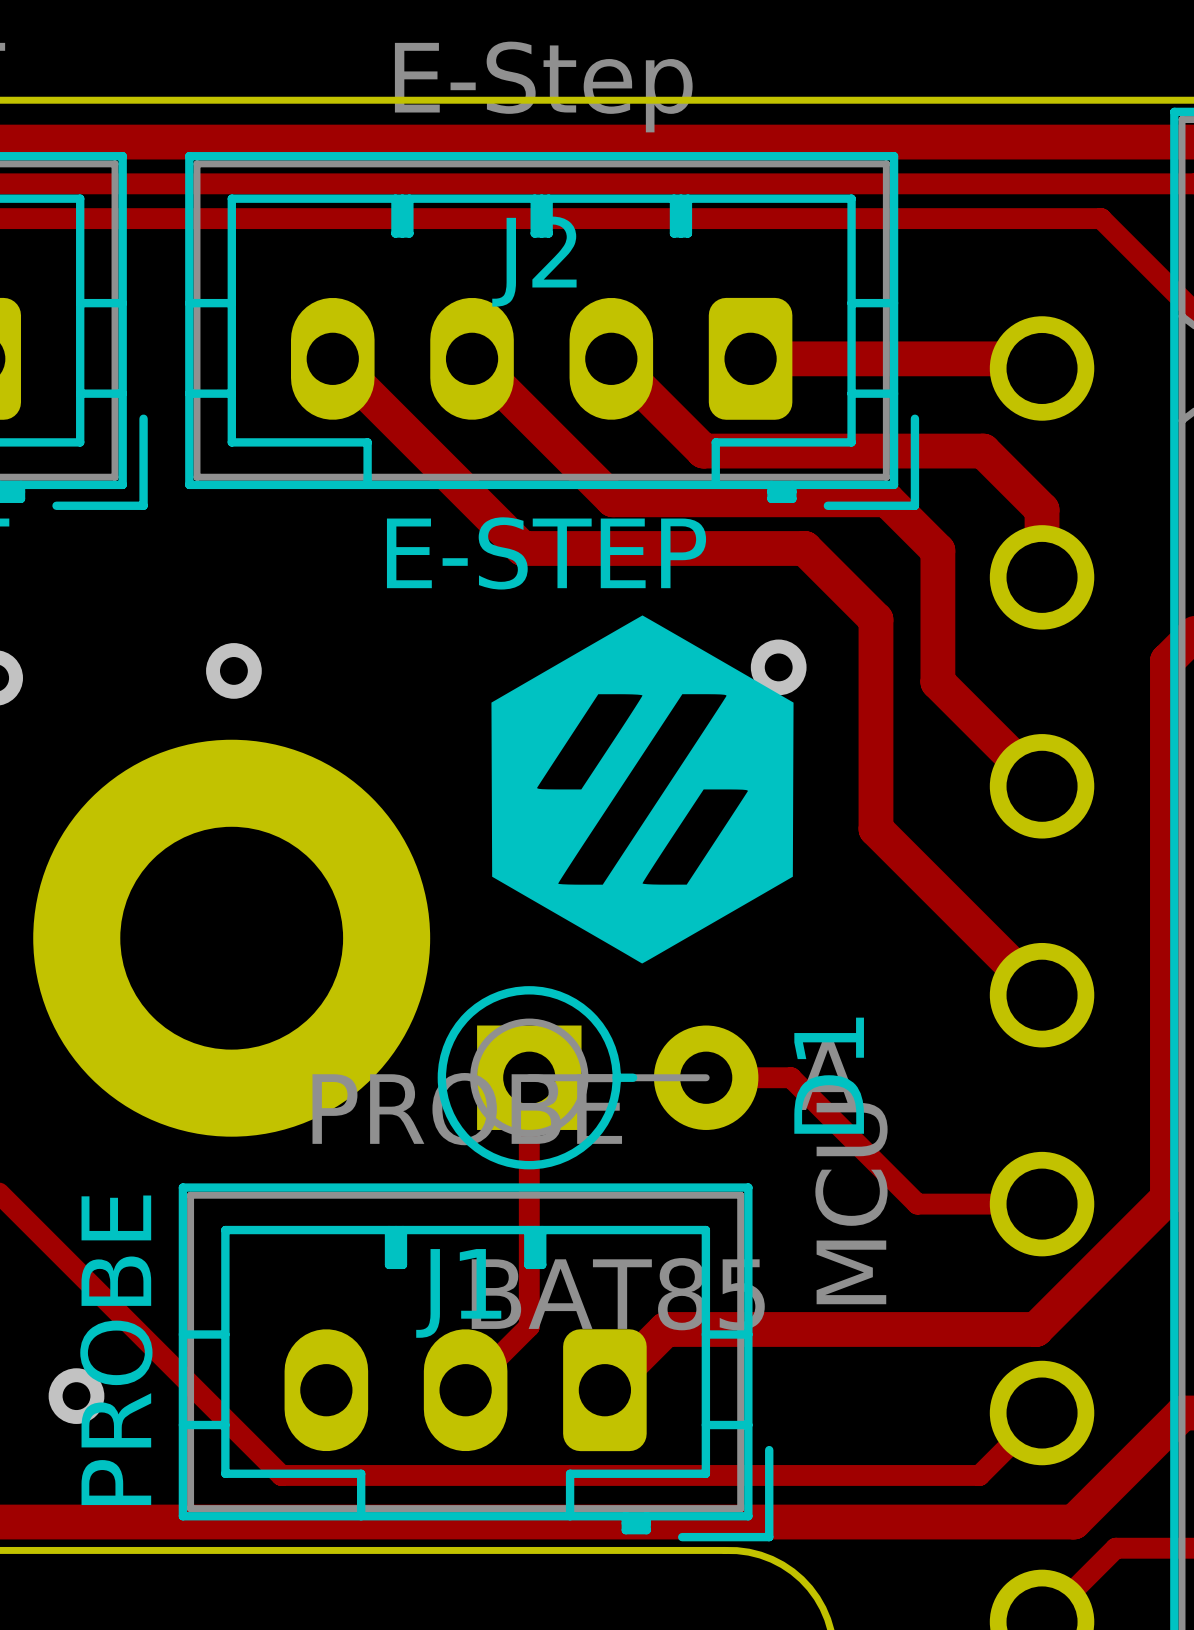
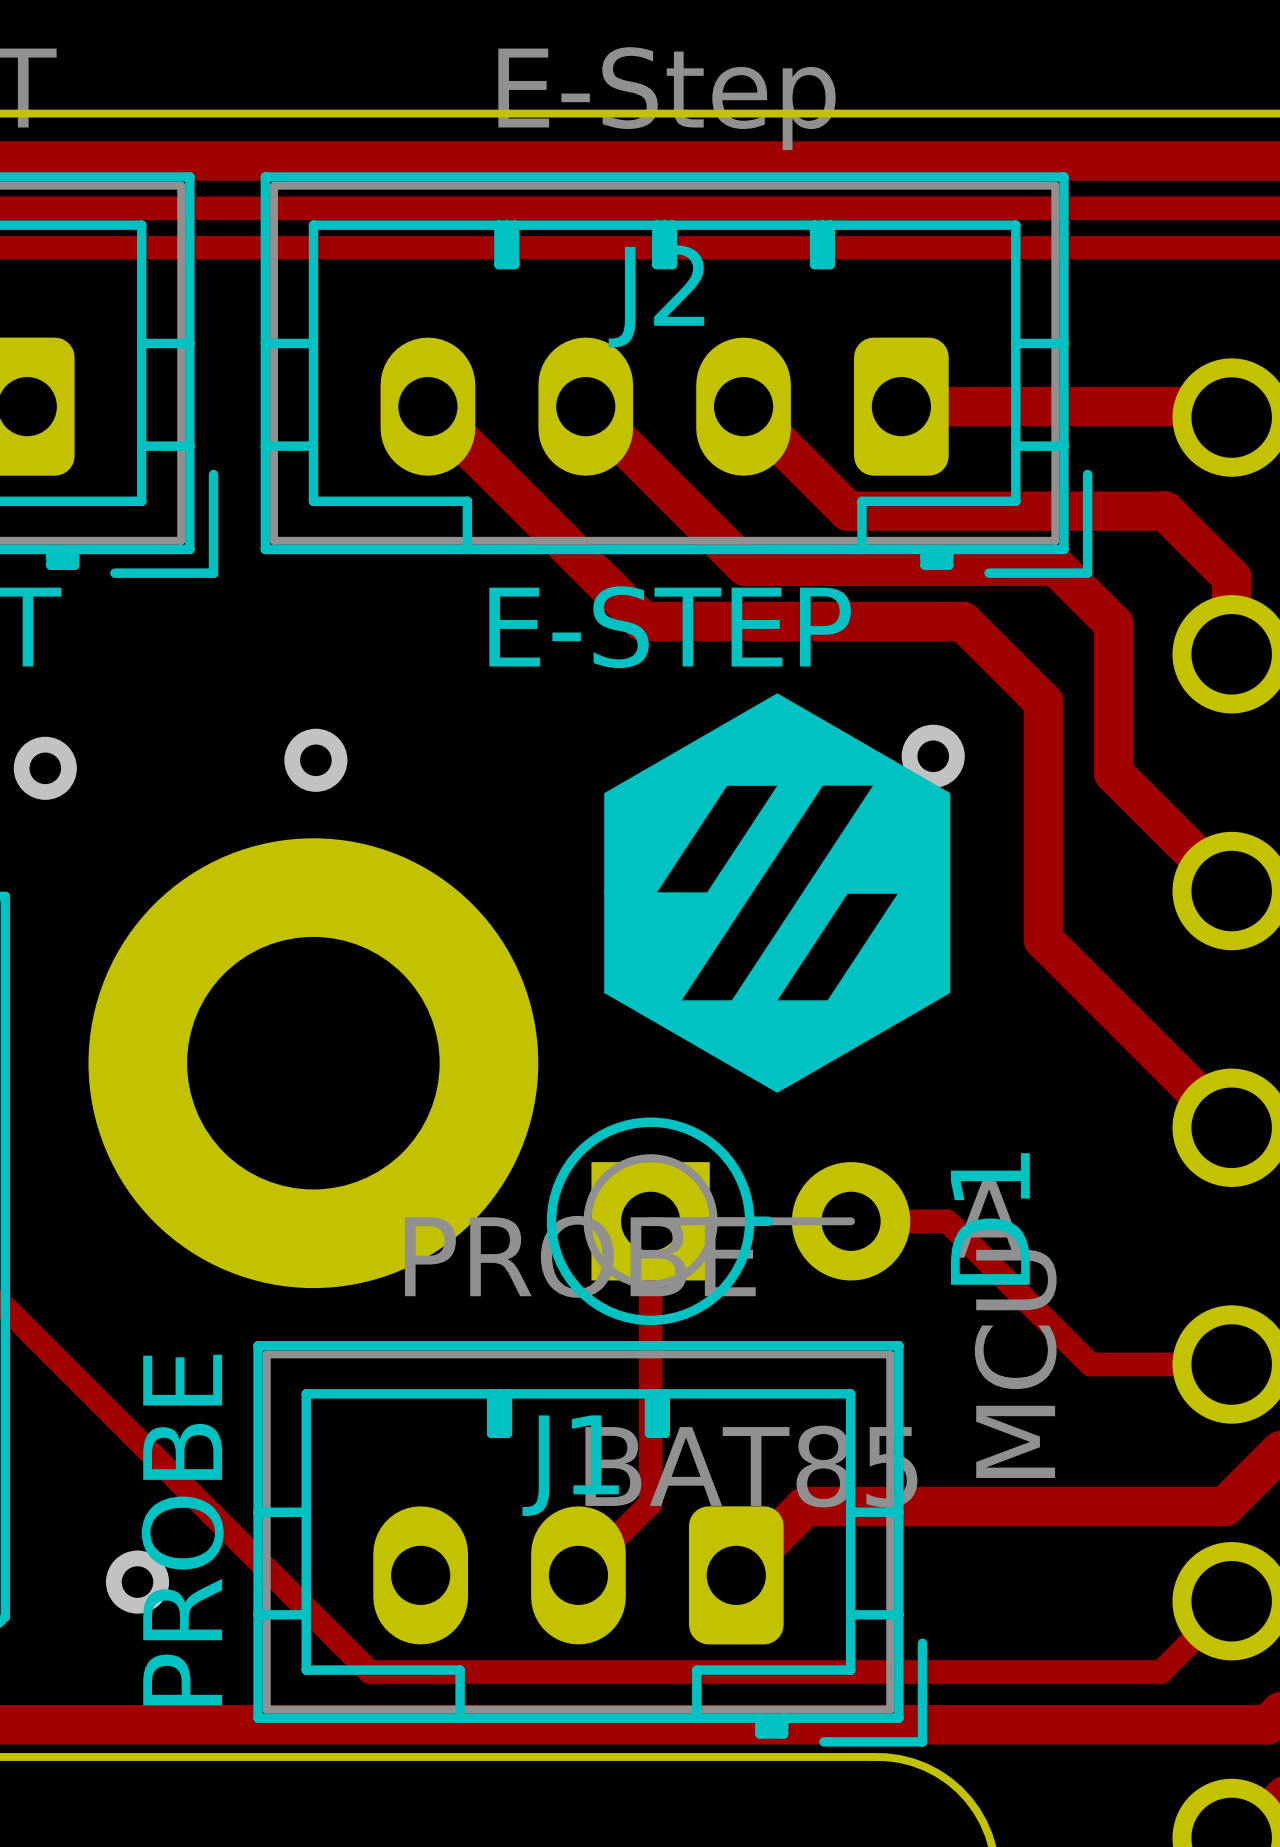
drawing shape: [491, 615, 794, 964] -> [604, 693, 951, 1093]

